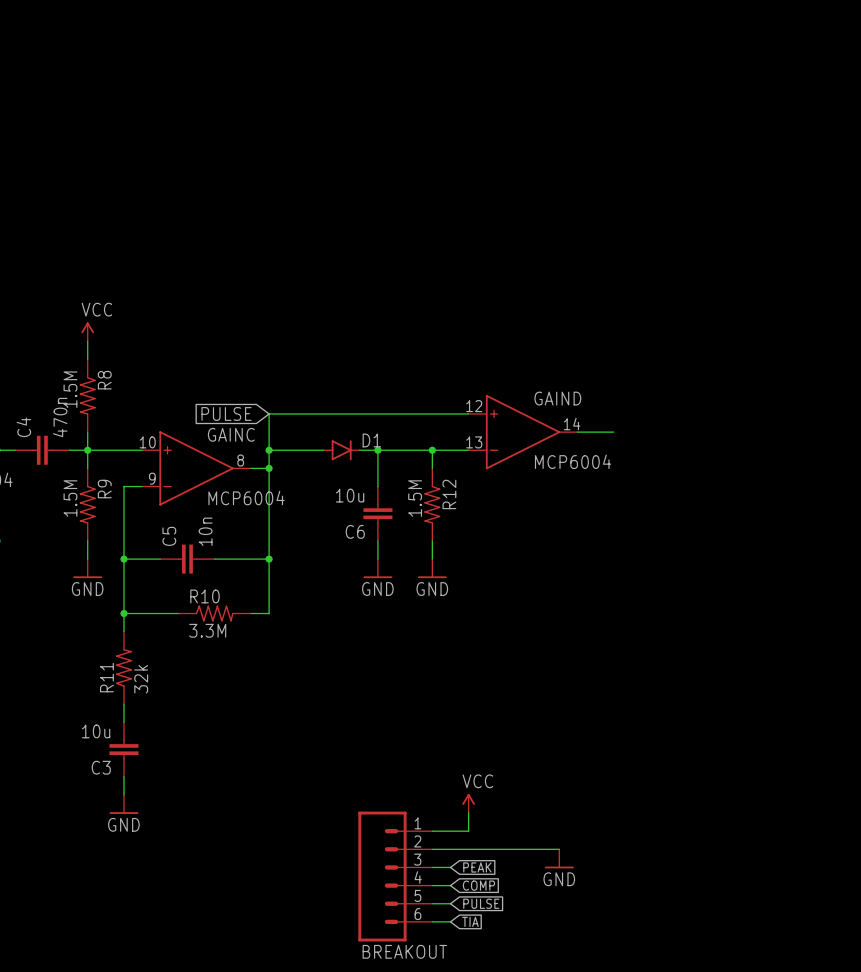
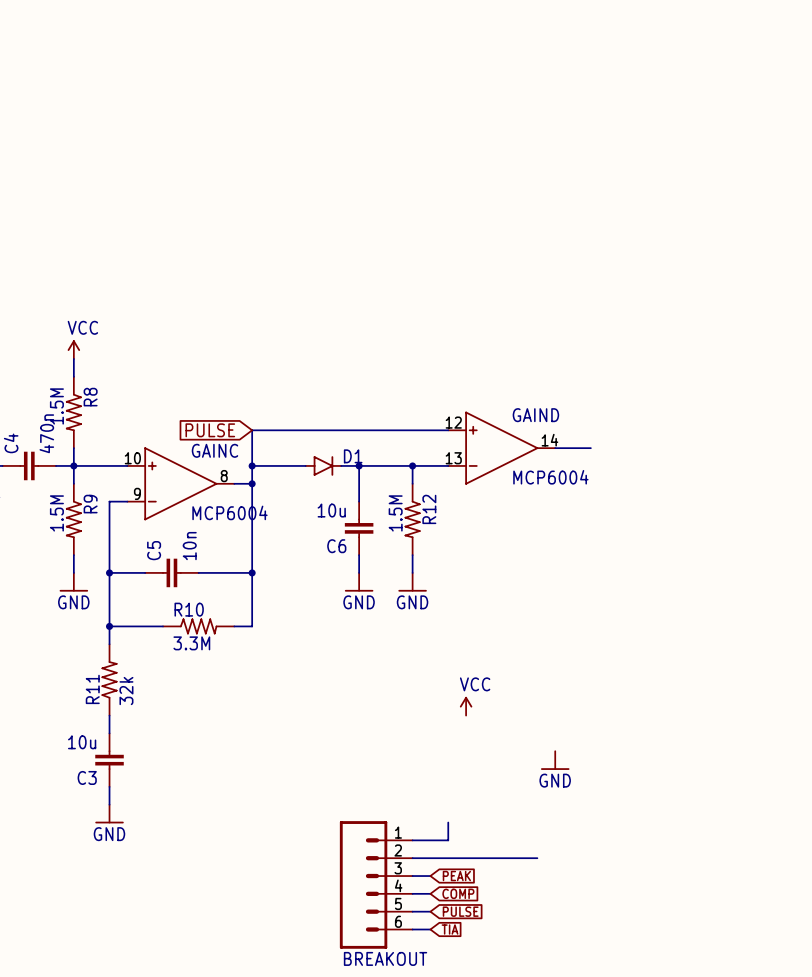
power symbol position: VCC (468, 803) -> VCC (466, 706)
power symbol position: GND (559, 858) -> GND (555, 760)

